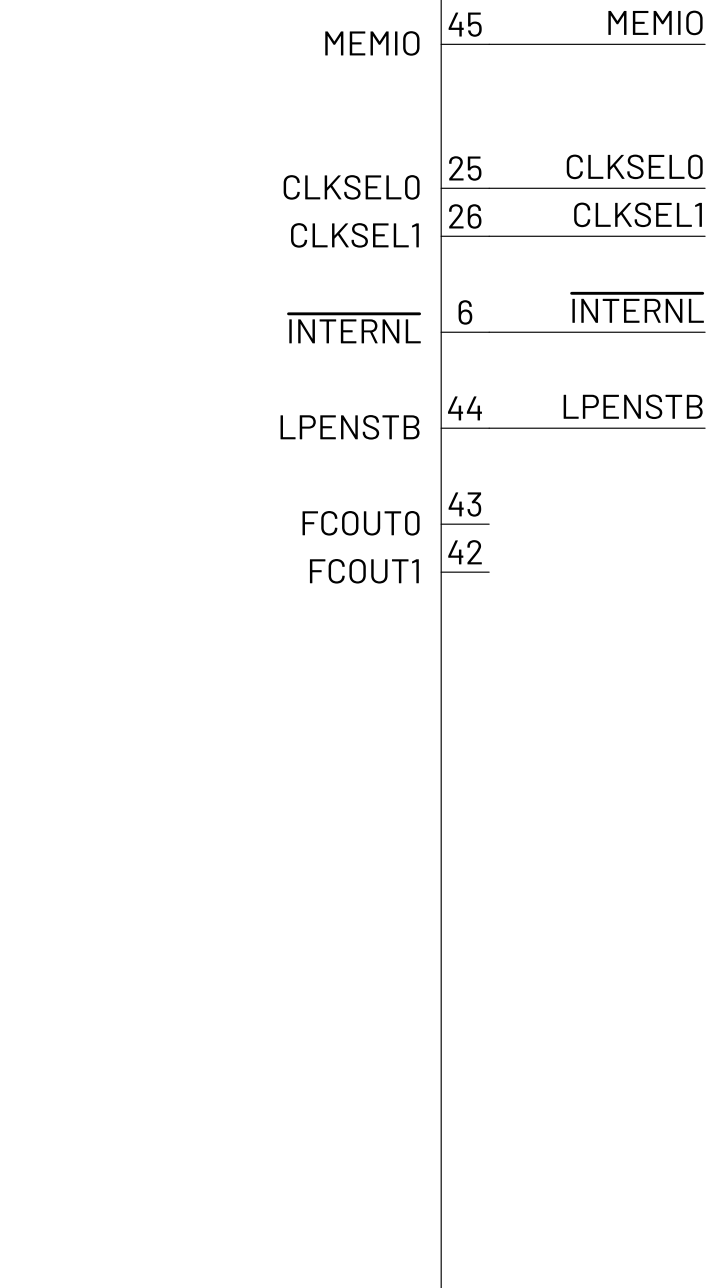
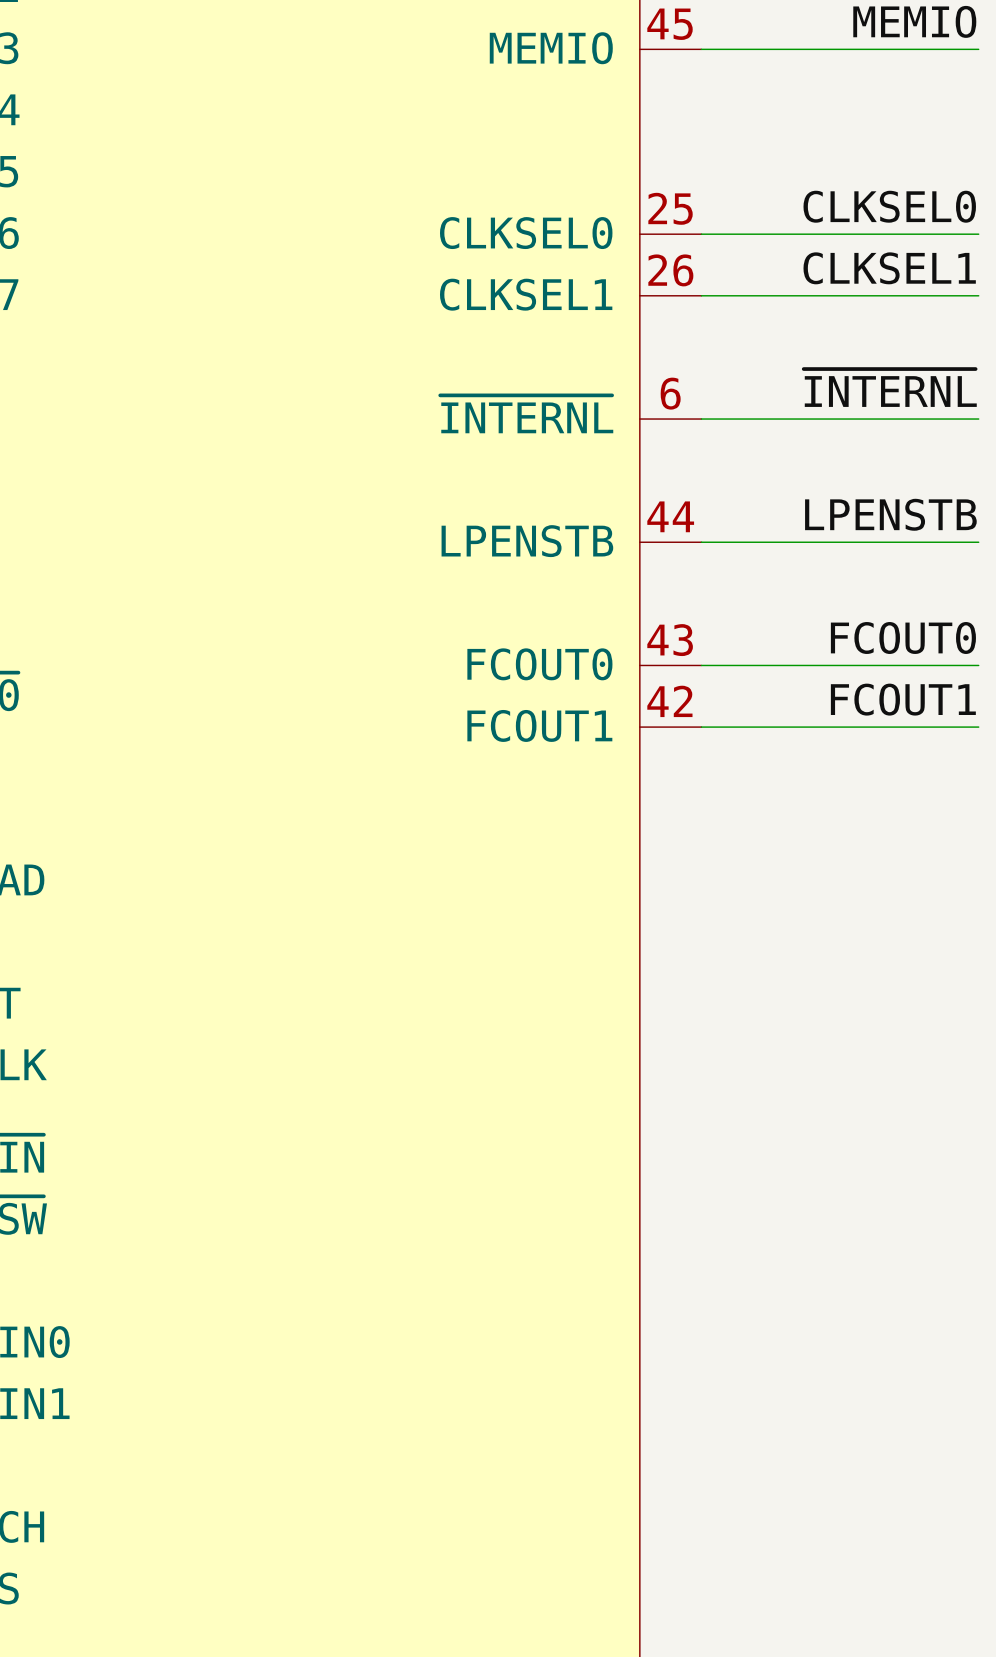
label: none -> FCOUT0 (903, 638)
wire: none -> (701, 665) (978, 665)
label: none -> FCOUT1 (903, 699)
wire: none -> (701, 727) (978, 727)

